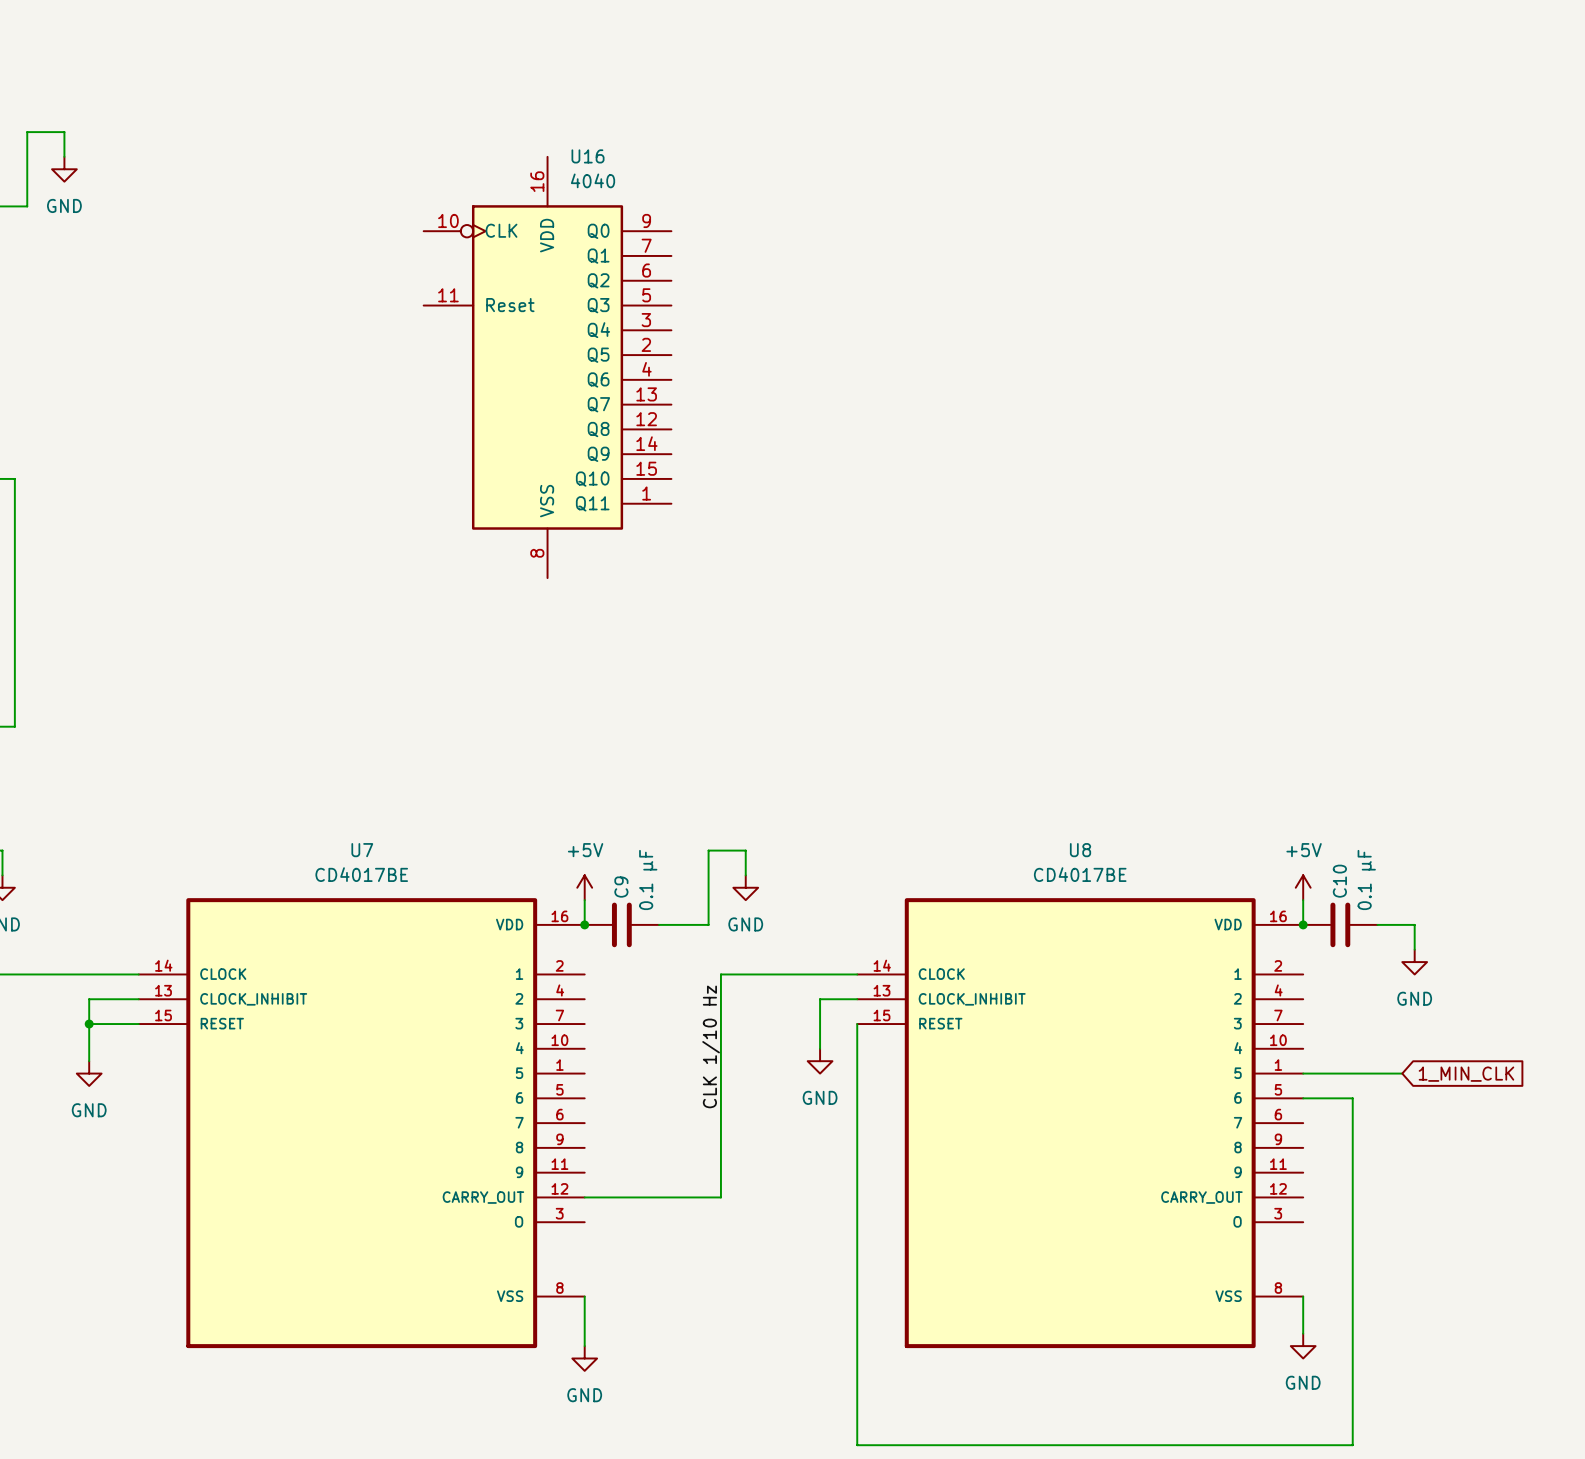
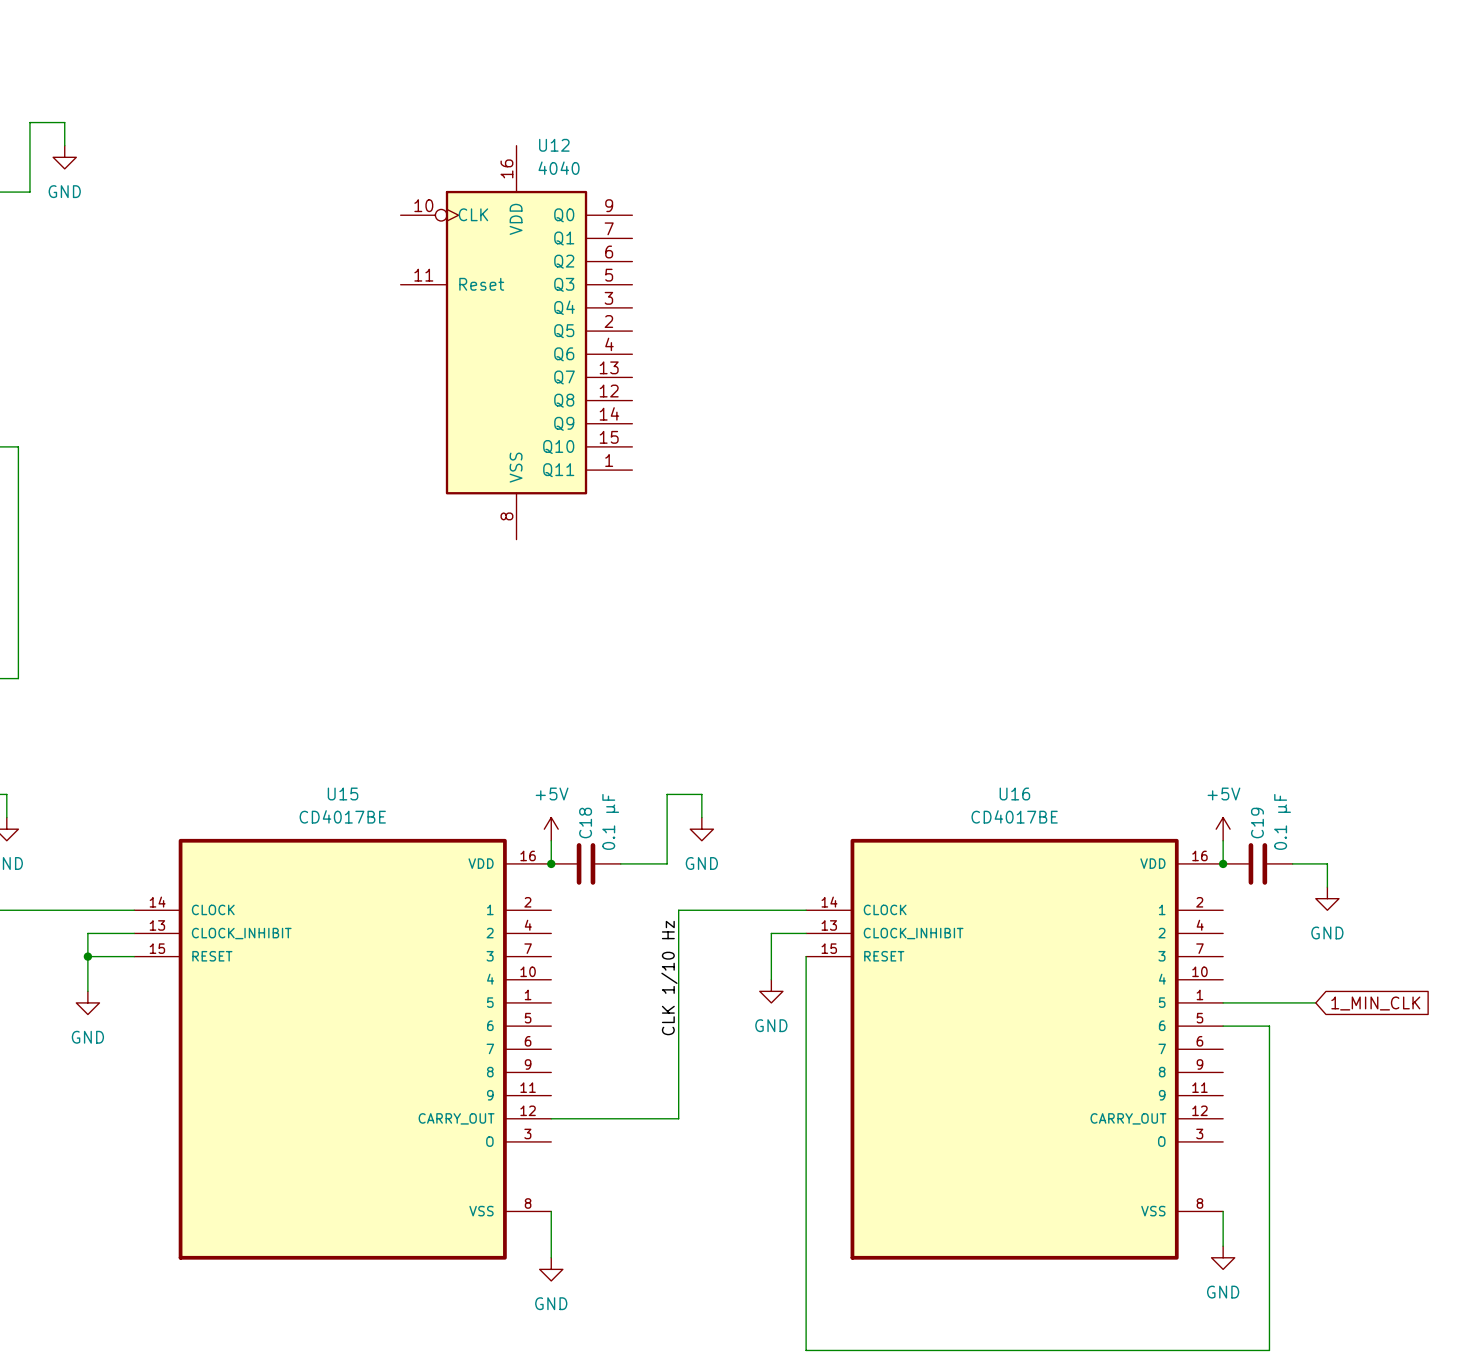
U16 name: U16 (588, 156) -> U12 (554, 145)
U7 name: U7 (362, 850) -> U15 (343, 793)
U8 name: U8 (1080, 850) -> U16 (1014, 793)
C10 name: C10 (1339, 881) -> C19 (1257, 823)
C9 name: C9 (621, 887) -> C18 (585, 823)

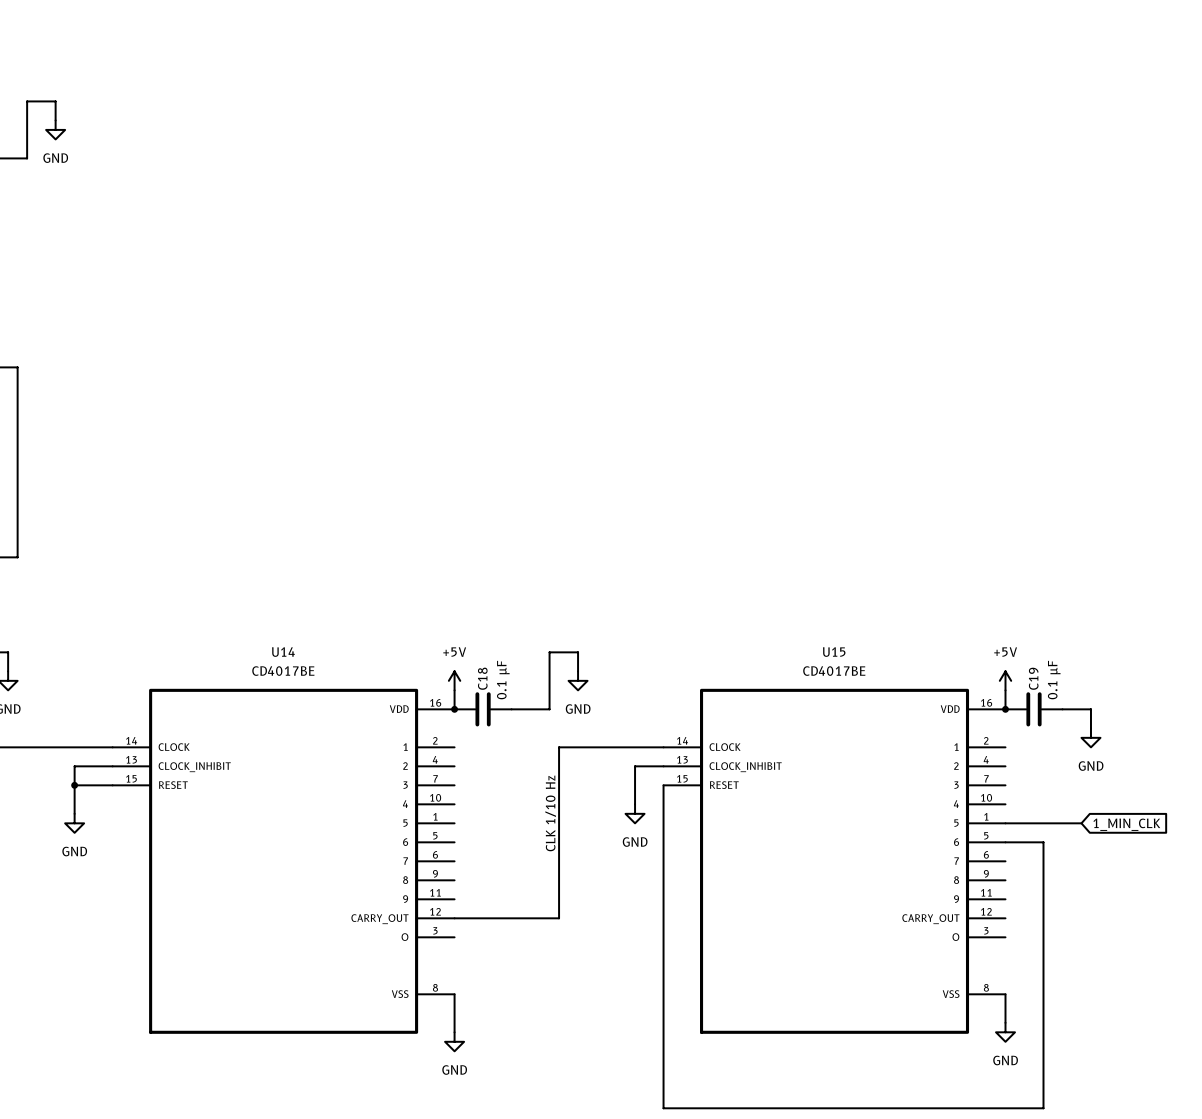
U12: 4040 (516, 342) -> none
U15 name: U15 (343, 793) -> U14 (283, 652)
U16 name: U16 (1014, 793) -> U15 (834, 652)

